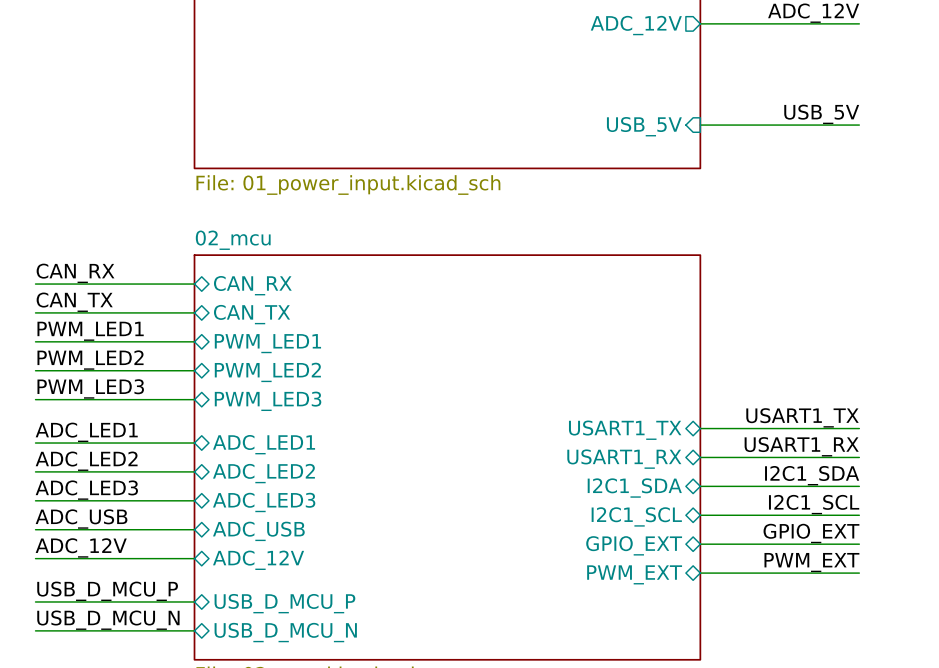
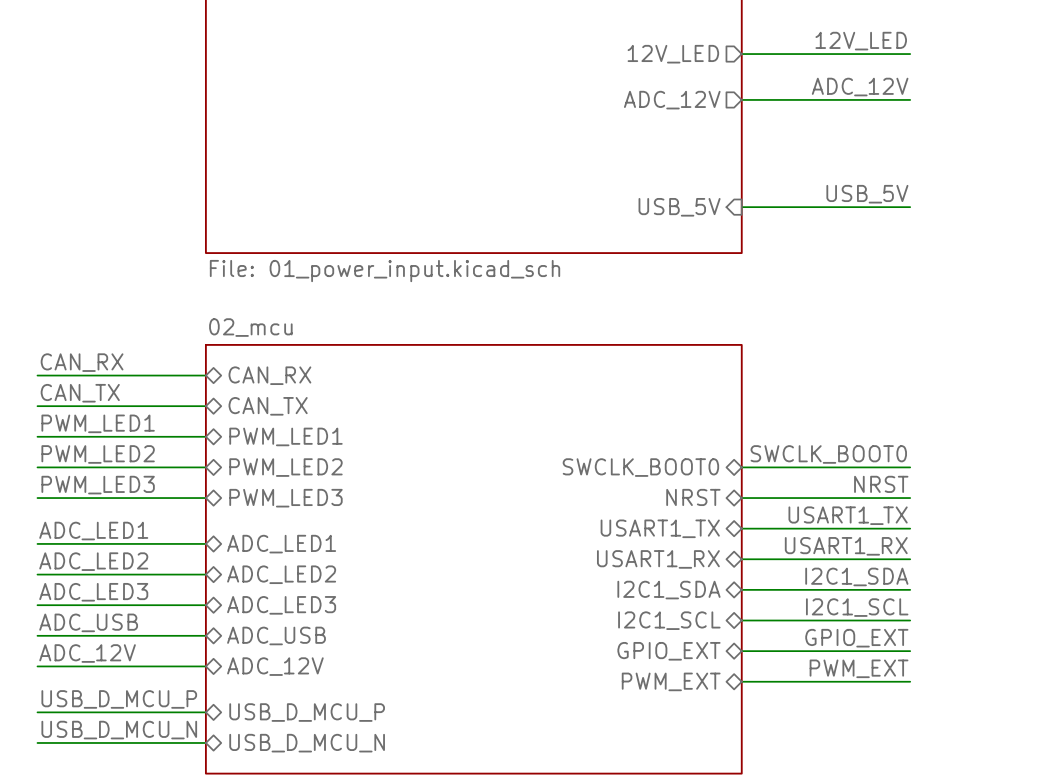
label: none -> SWCLK_BOOT0 (828, 454)
wire: none -> (741, 467) (910, 467)
sheet pin: none -> SWCLK_BOOT0 (640, 467)
label: none -> NRST (881, 484)
sheet pin: none -> NRST (693, 497)
wire: none -> (741, 498) (910, 498)

